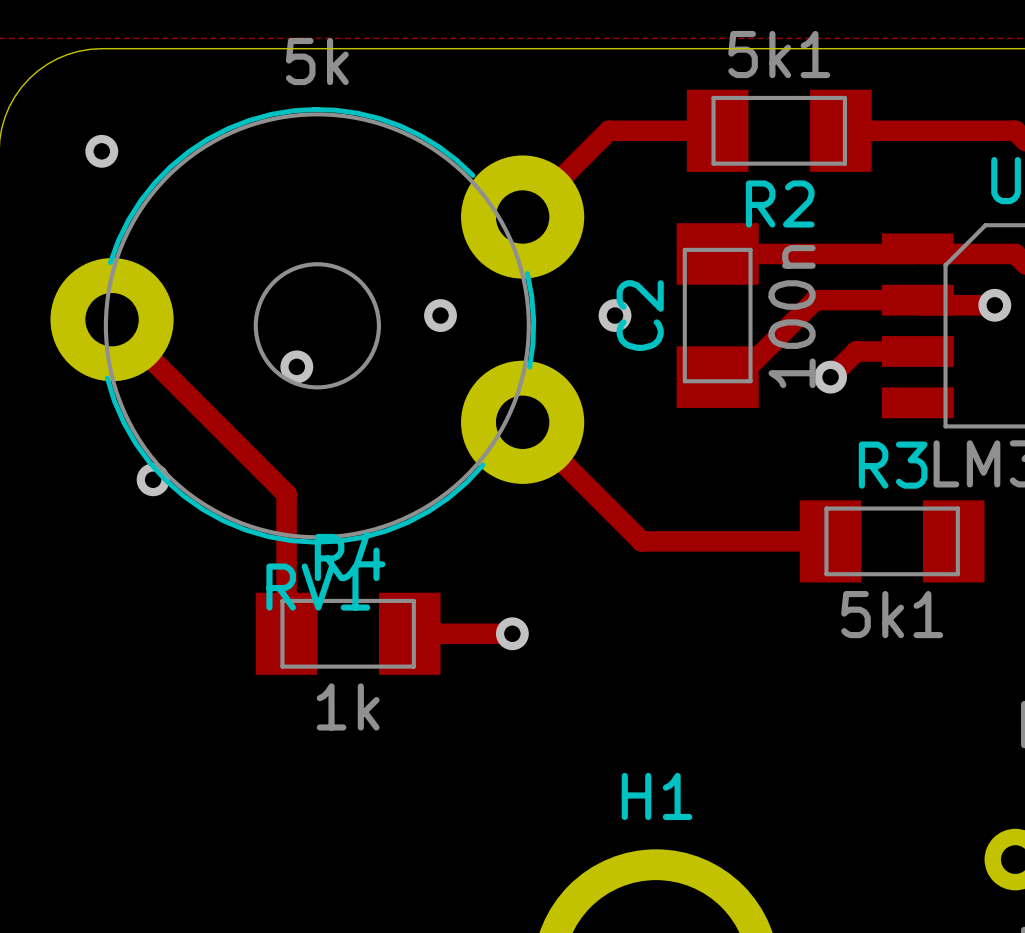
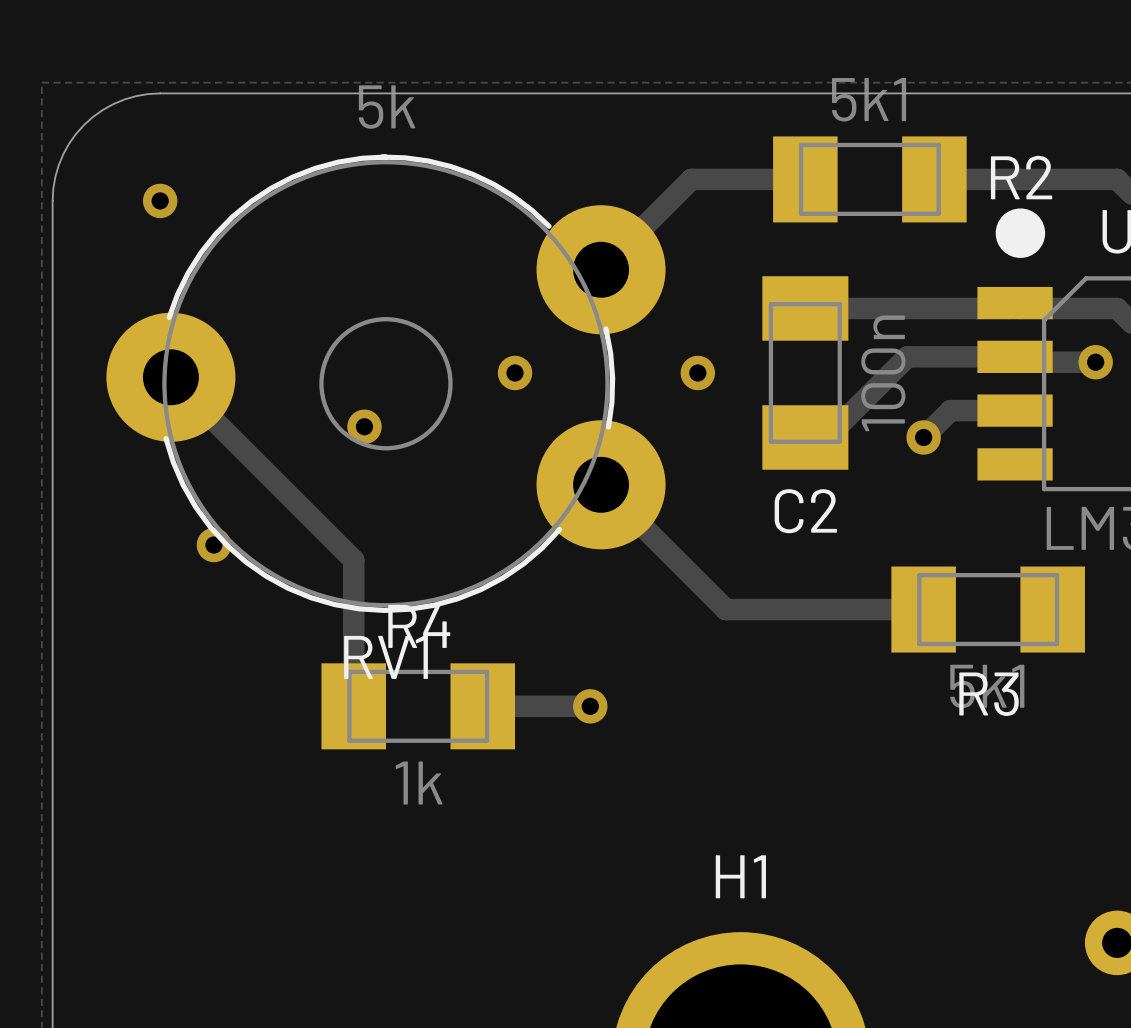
drawing: none -> [995, 208, 1046, 258]
R2 name position: R2 (780, 203) -> R2 (1021, 177)
C2 name rotation: 0° (640, 315) -> 90° clockwise (805, 511)
C2 name position: C2 (640, 315) -> C2 (805, 511)
R3 name position: R3 (893, 465) -> R3 (989, 694)

